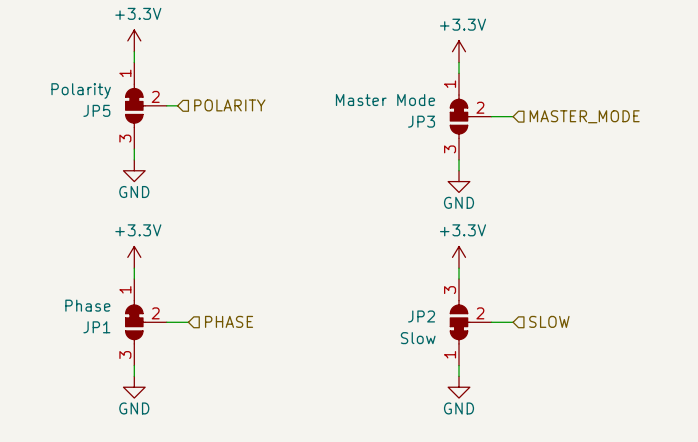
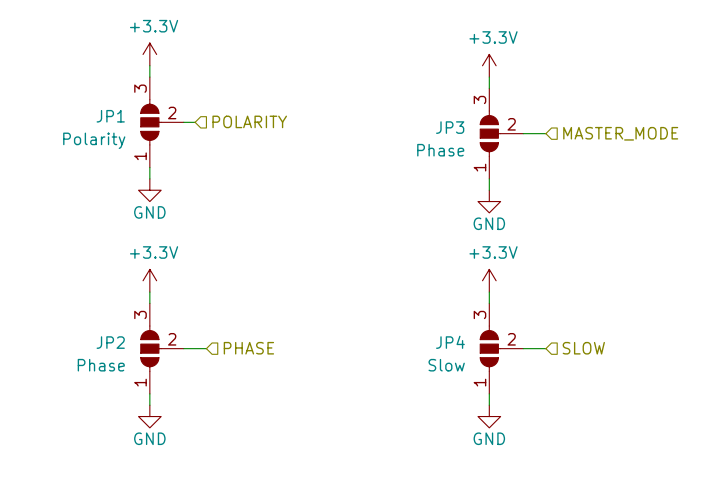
JP3 symbol: [450, 73, 492, 160] -> [480, 88, 524, 179]
JP3 value: Master Mode (385, 100) -> Phase (440, 150)
JP5: Polarity (146, 105) -> none
JP1 symbol: [125, 279, 167, 366] -> [140, 77, 184, 168]
JP2 symbol: [450, 279, 492, 366] -> [140, 303, 184, 394]
JP1 value: Phase (87, 305) -> Polarity (94, 140)
JP4: none -> Slow (501, 348)
JP2 value: Slow (418, 338) -> Phase (101, 365)

